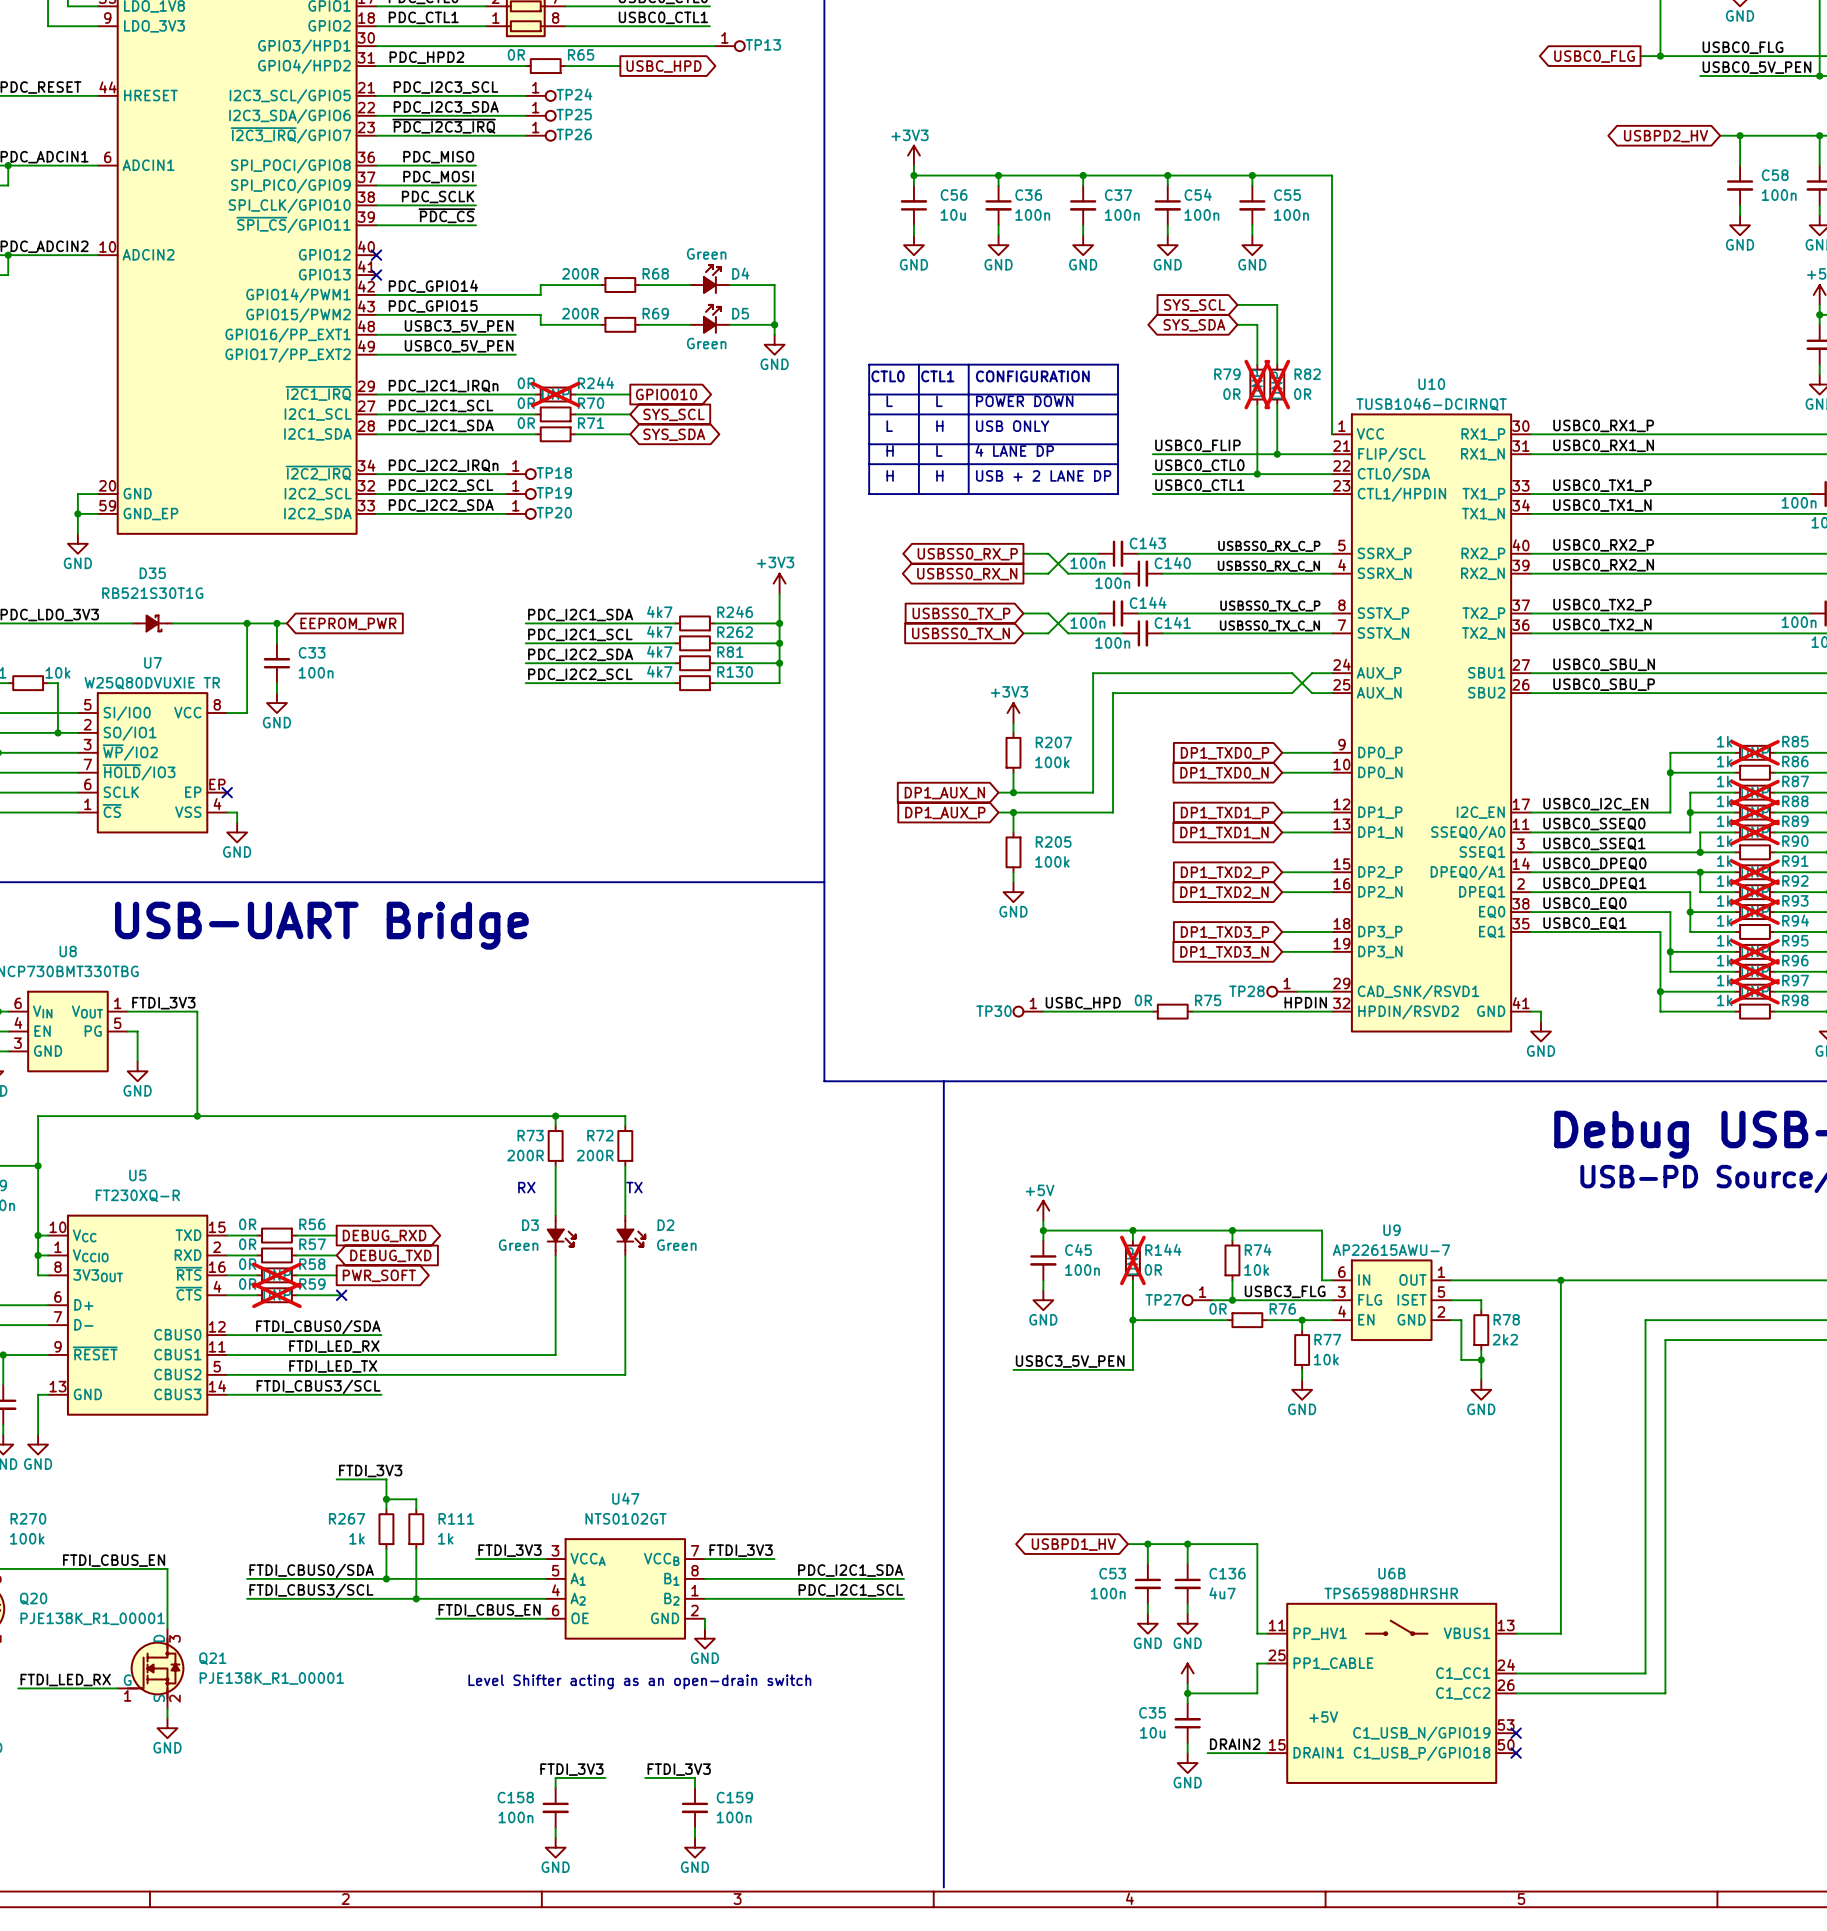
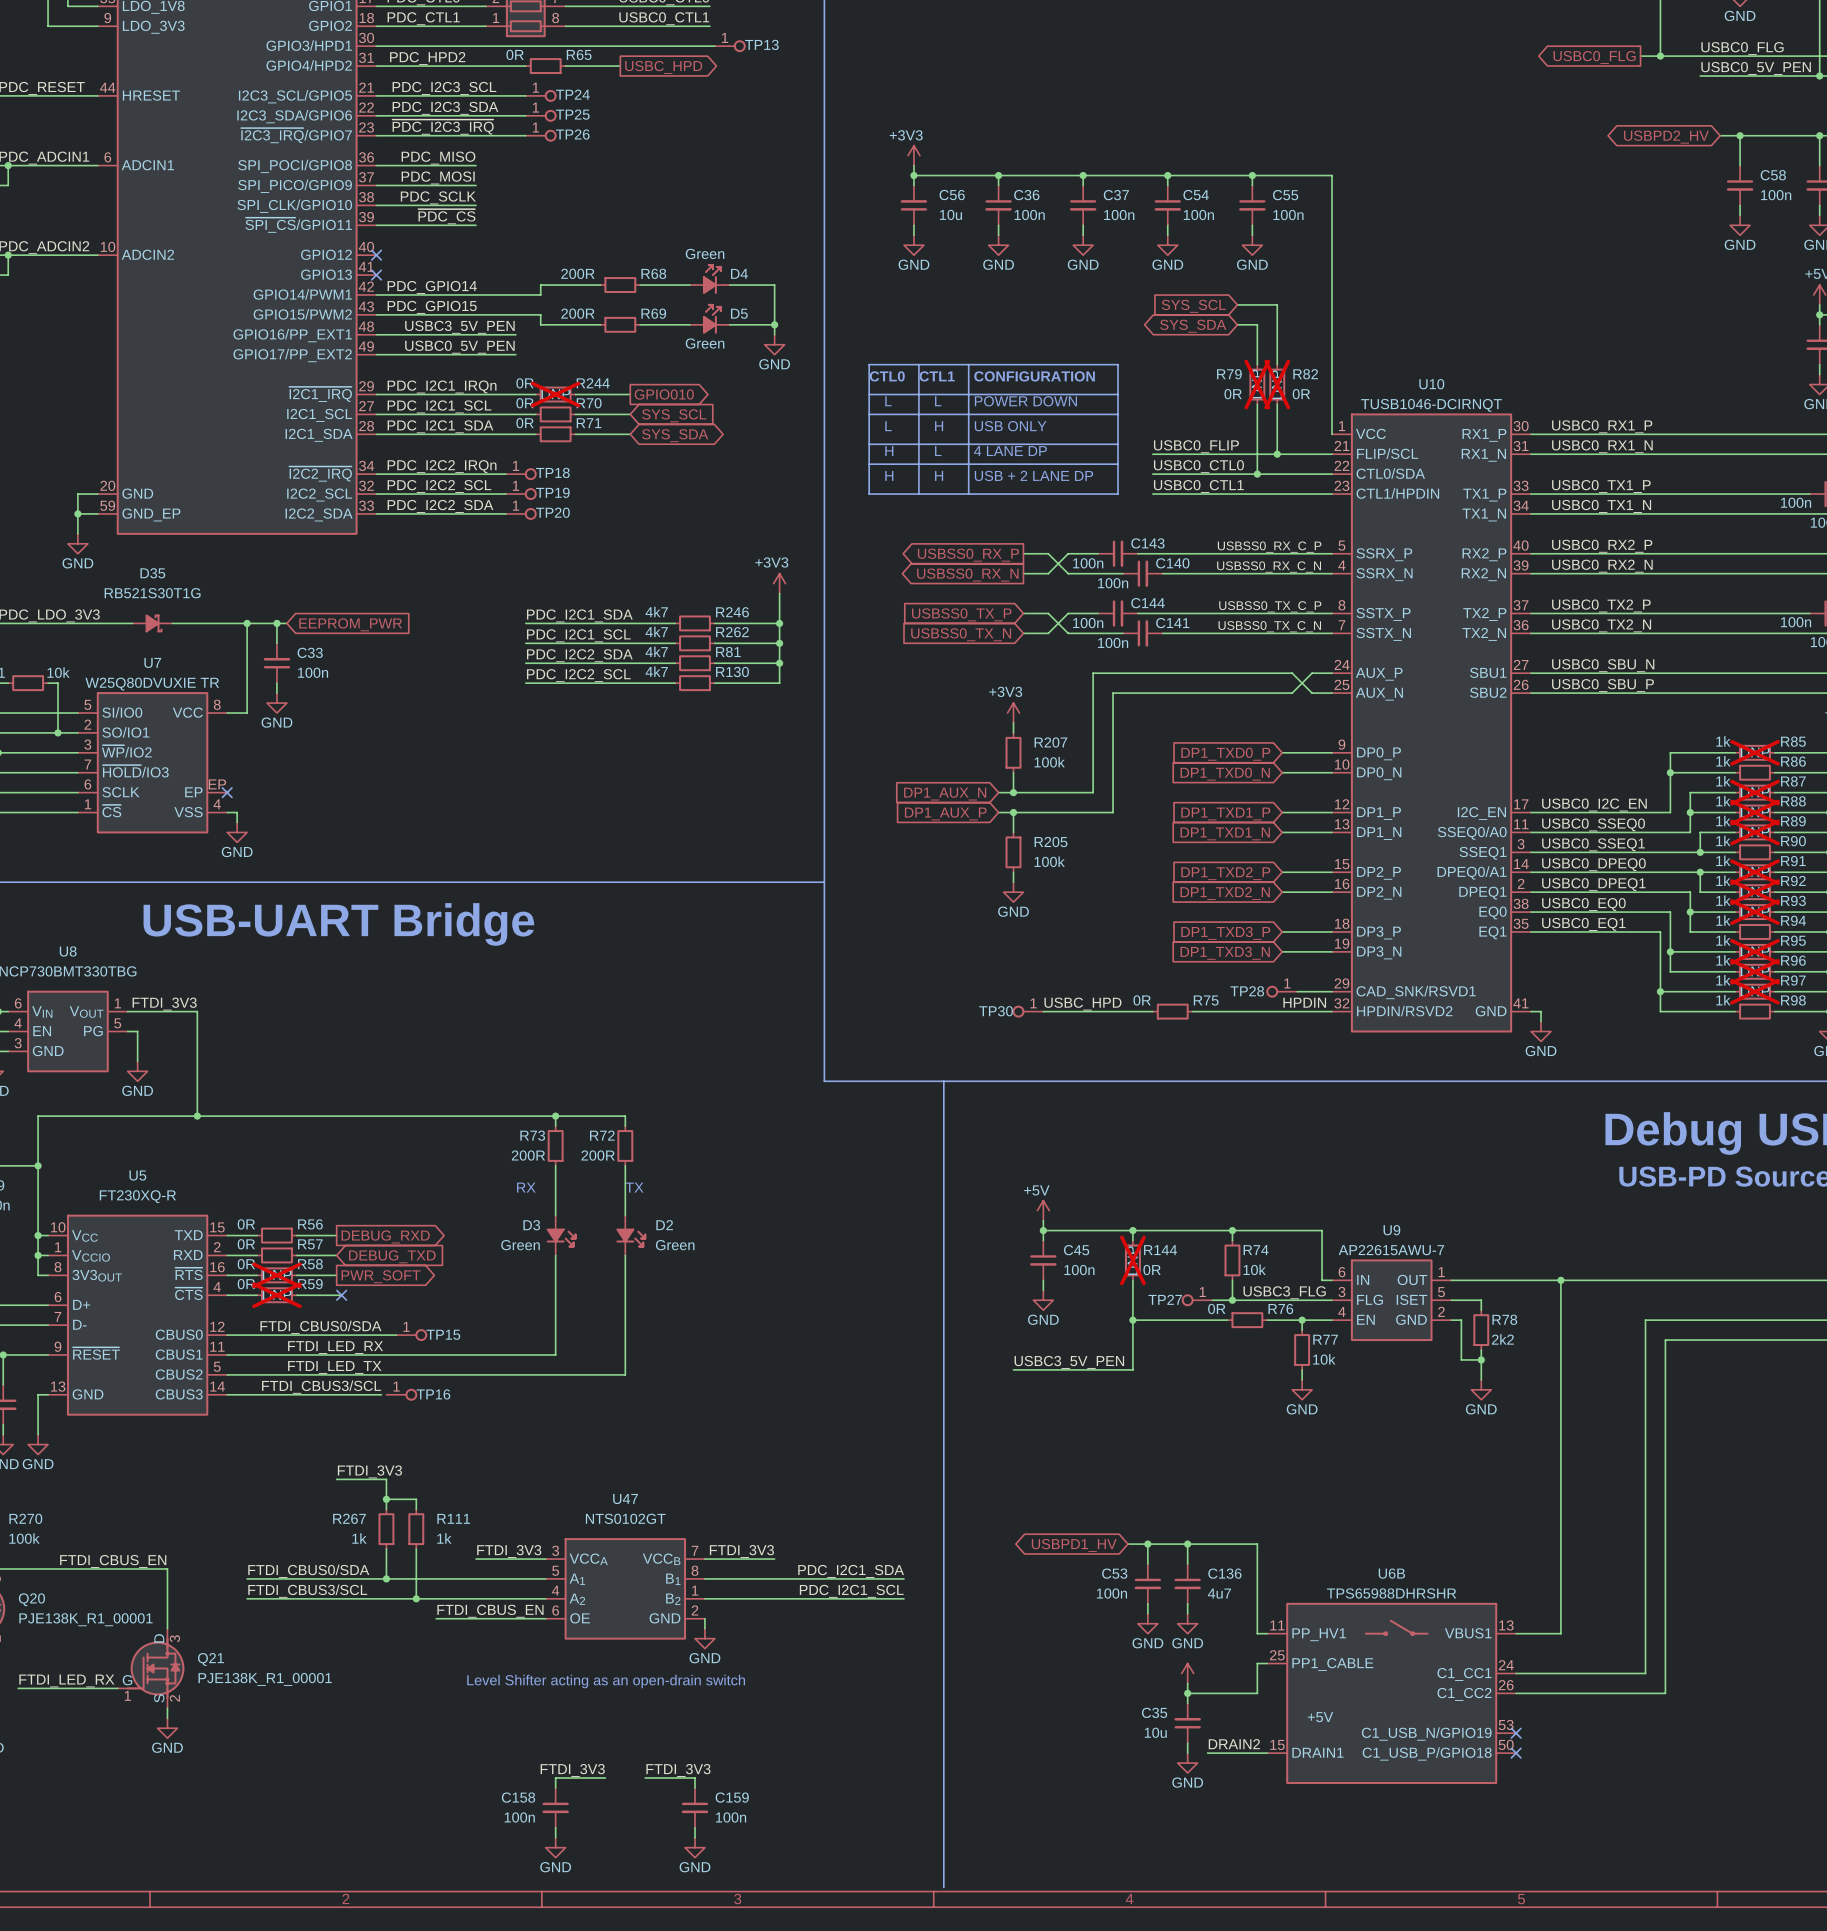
wire: none -> (381, 1335) (396, 1335)
TP15: none -> (411, 1335)
TP16: none -> (401, 1394)

